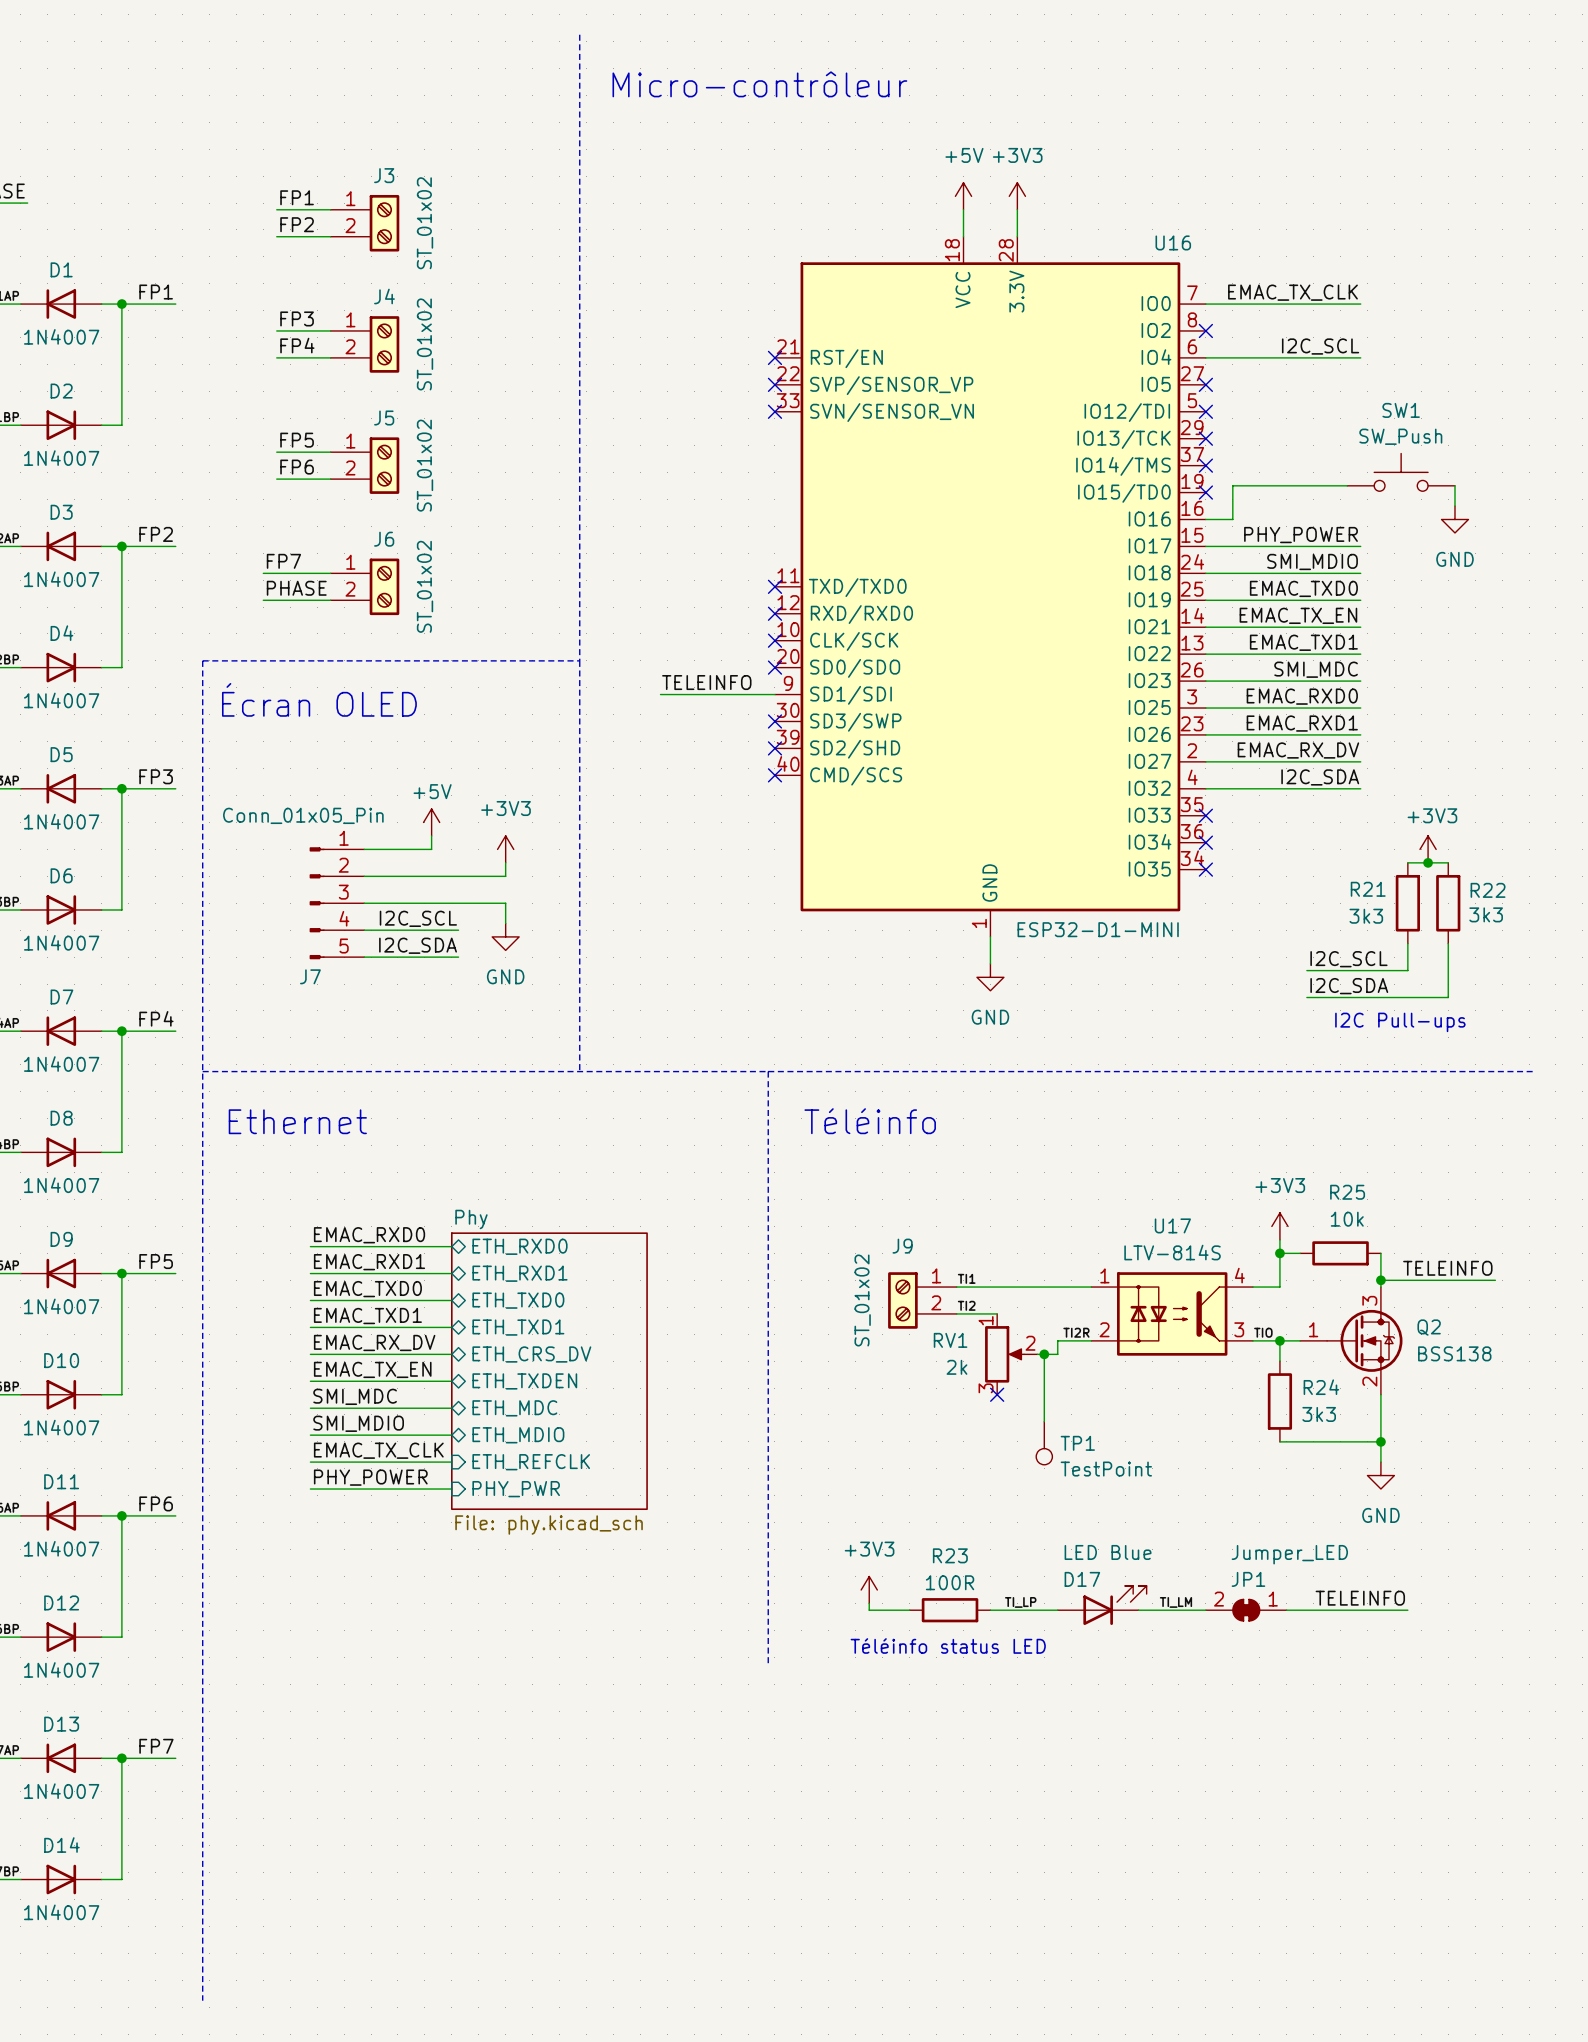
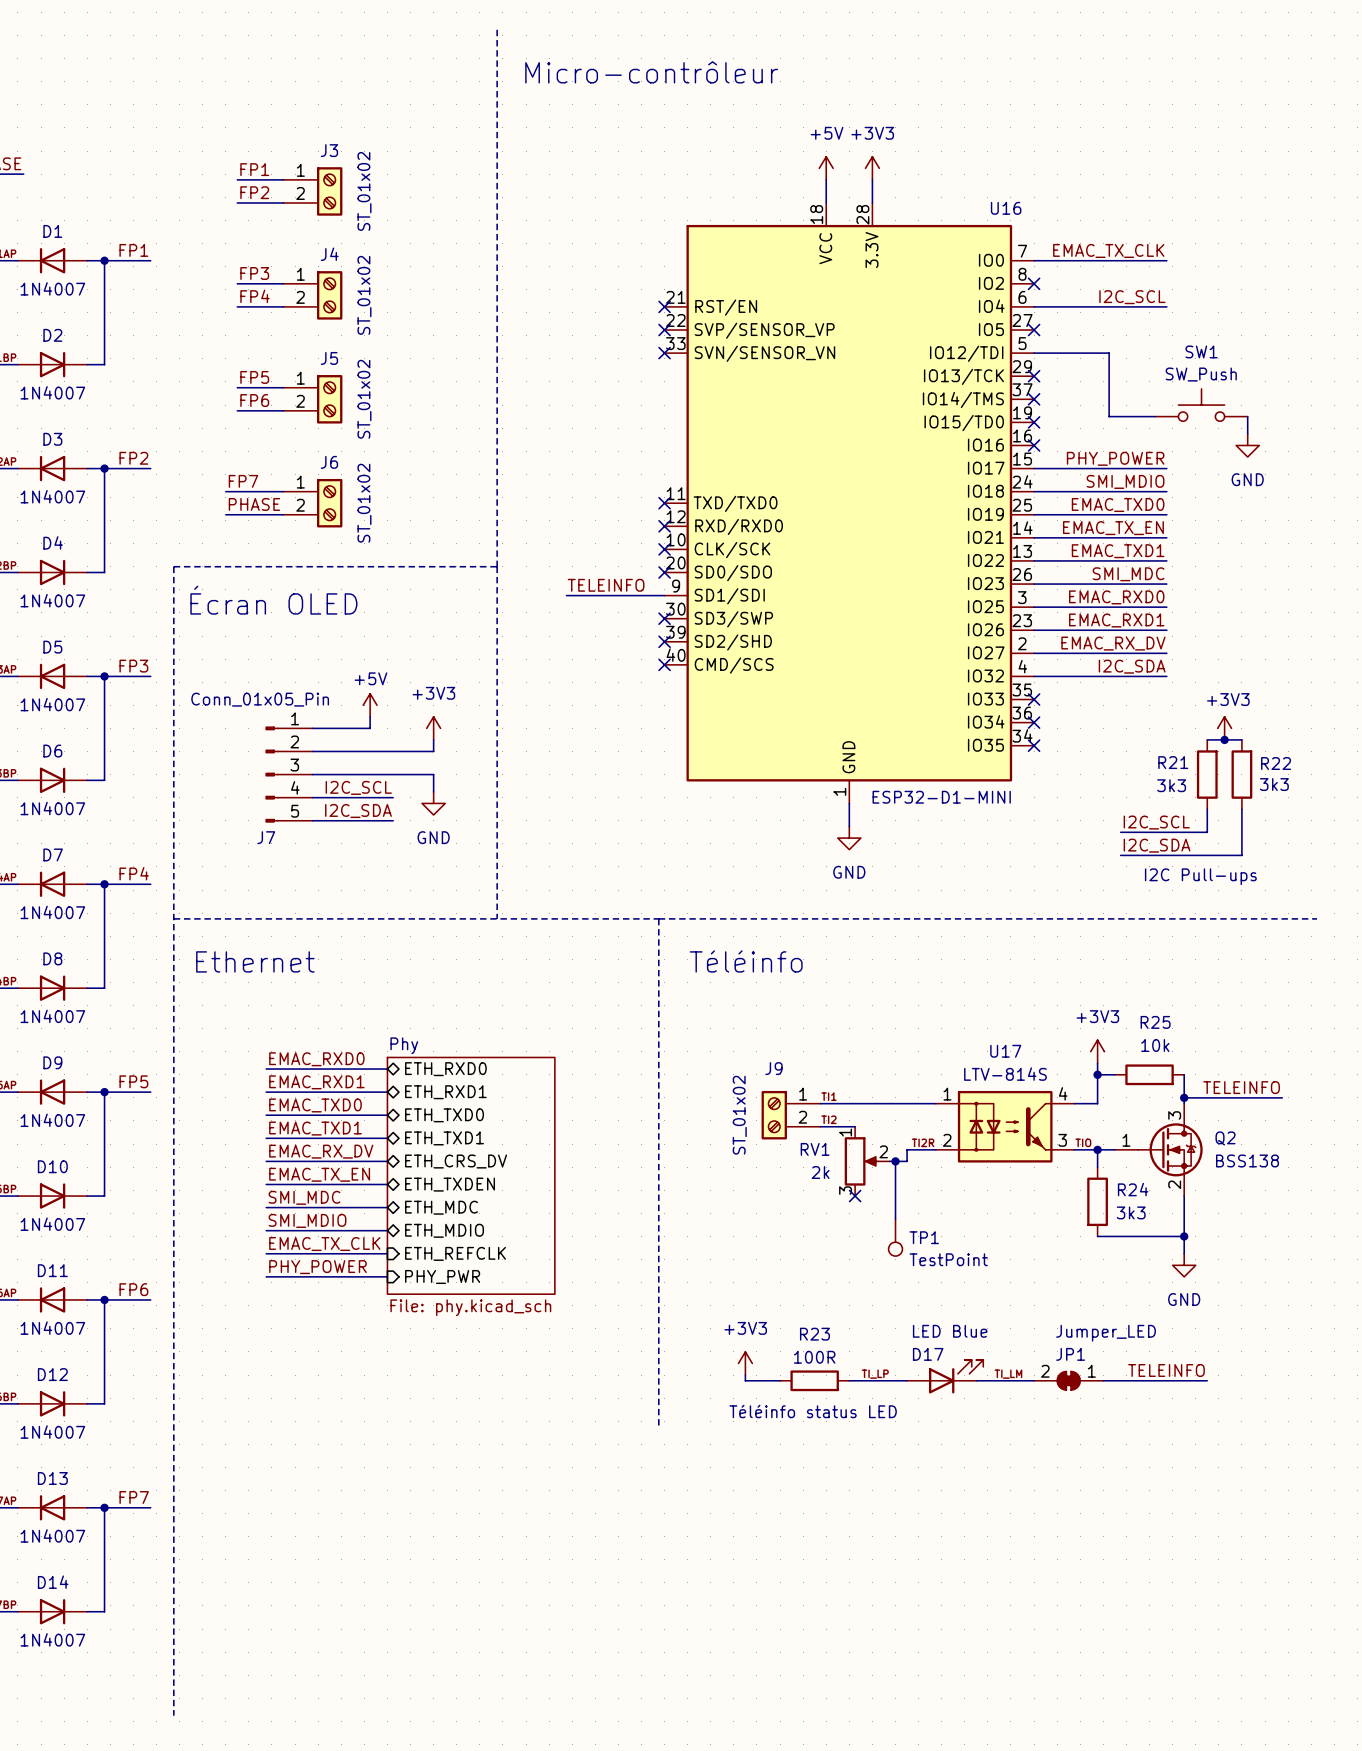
no-connect mark: (1205, 411) -> none
wire: (1293, 485) (1232, 485) (1232, 519) (1205, 519) -> (1109, 416) (1109, 353) (1034, 353)
no-connect mark: none -> (1034, 445)

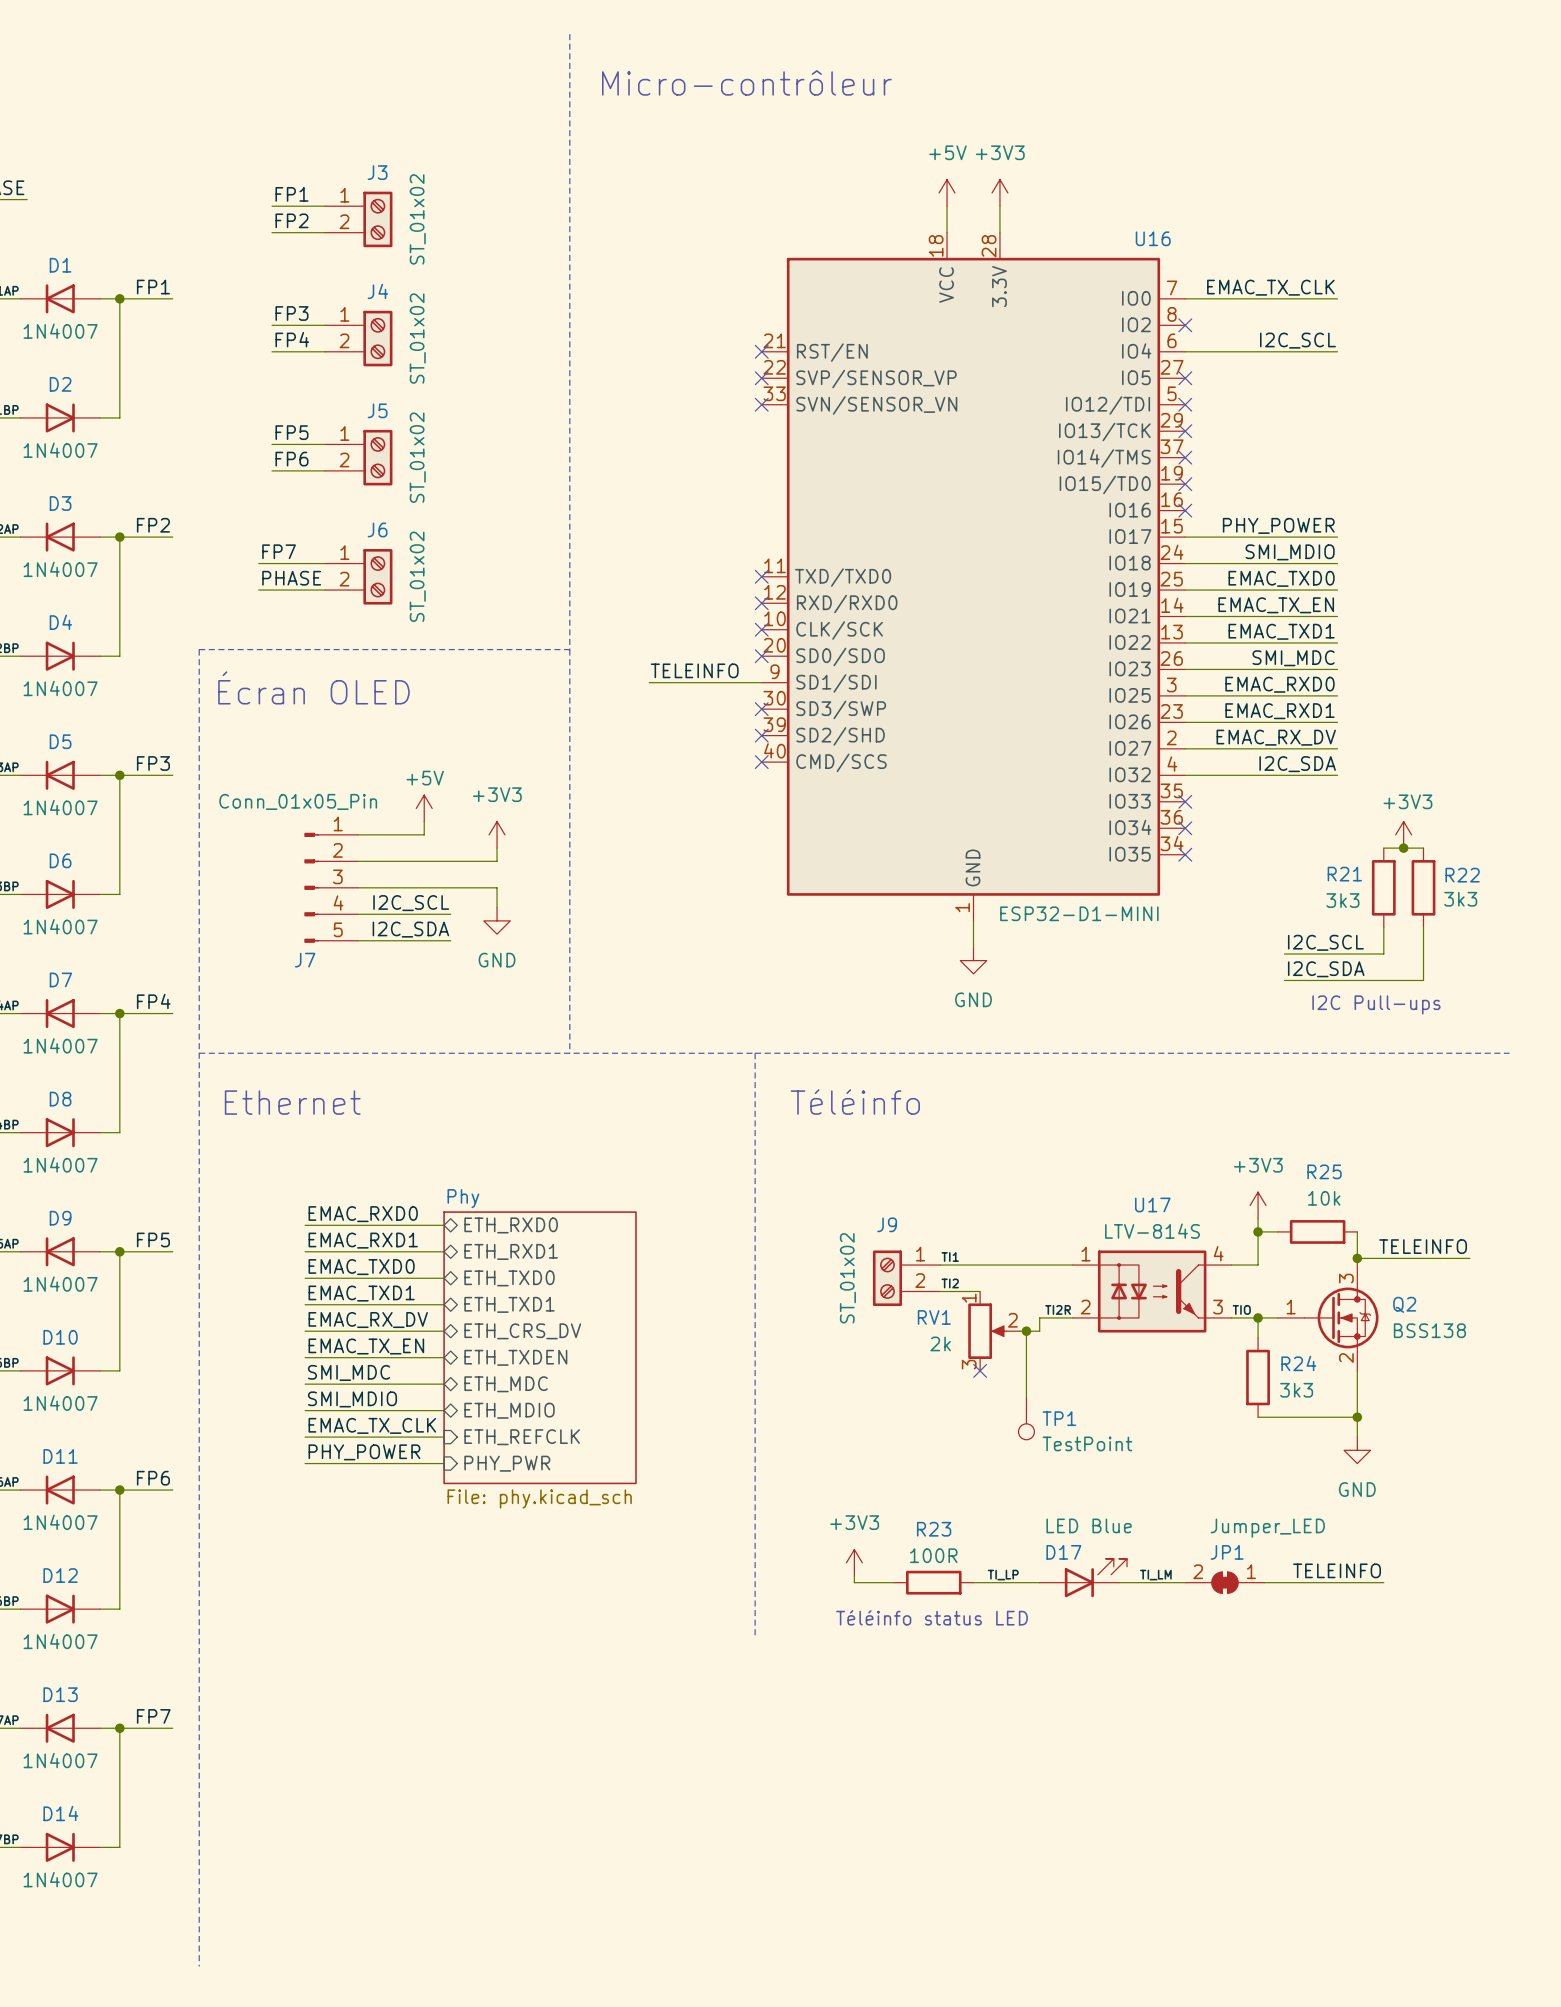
wire: (1034, 353) (1109, 353) (1109, 416) (1155, 416) -> none
no-connect mark: none -> (1185, 404)
SW1: SW_Push (1201, 405) -> none
wire: (1247, 416) (1247, 433) -> none
power symbol: GND (1247, 445) -> none

